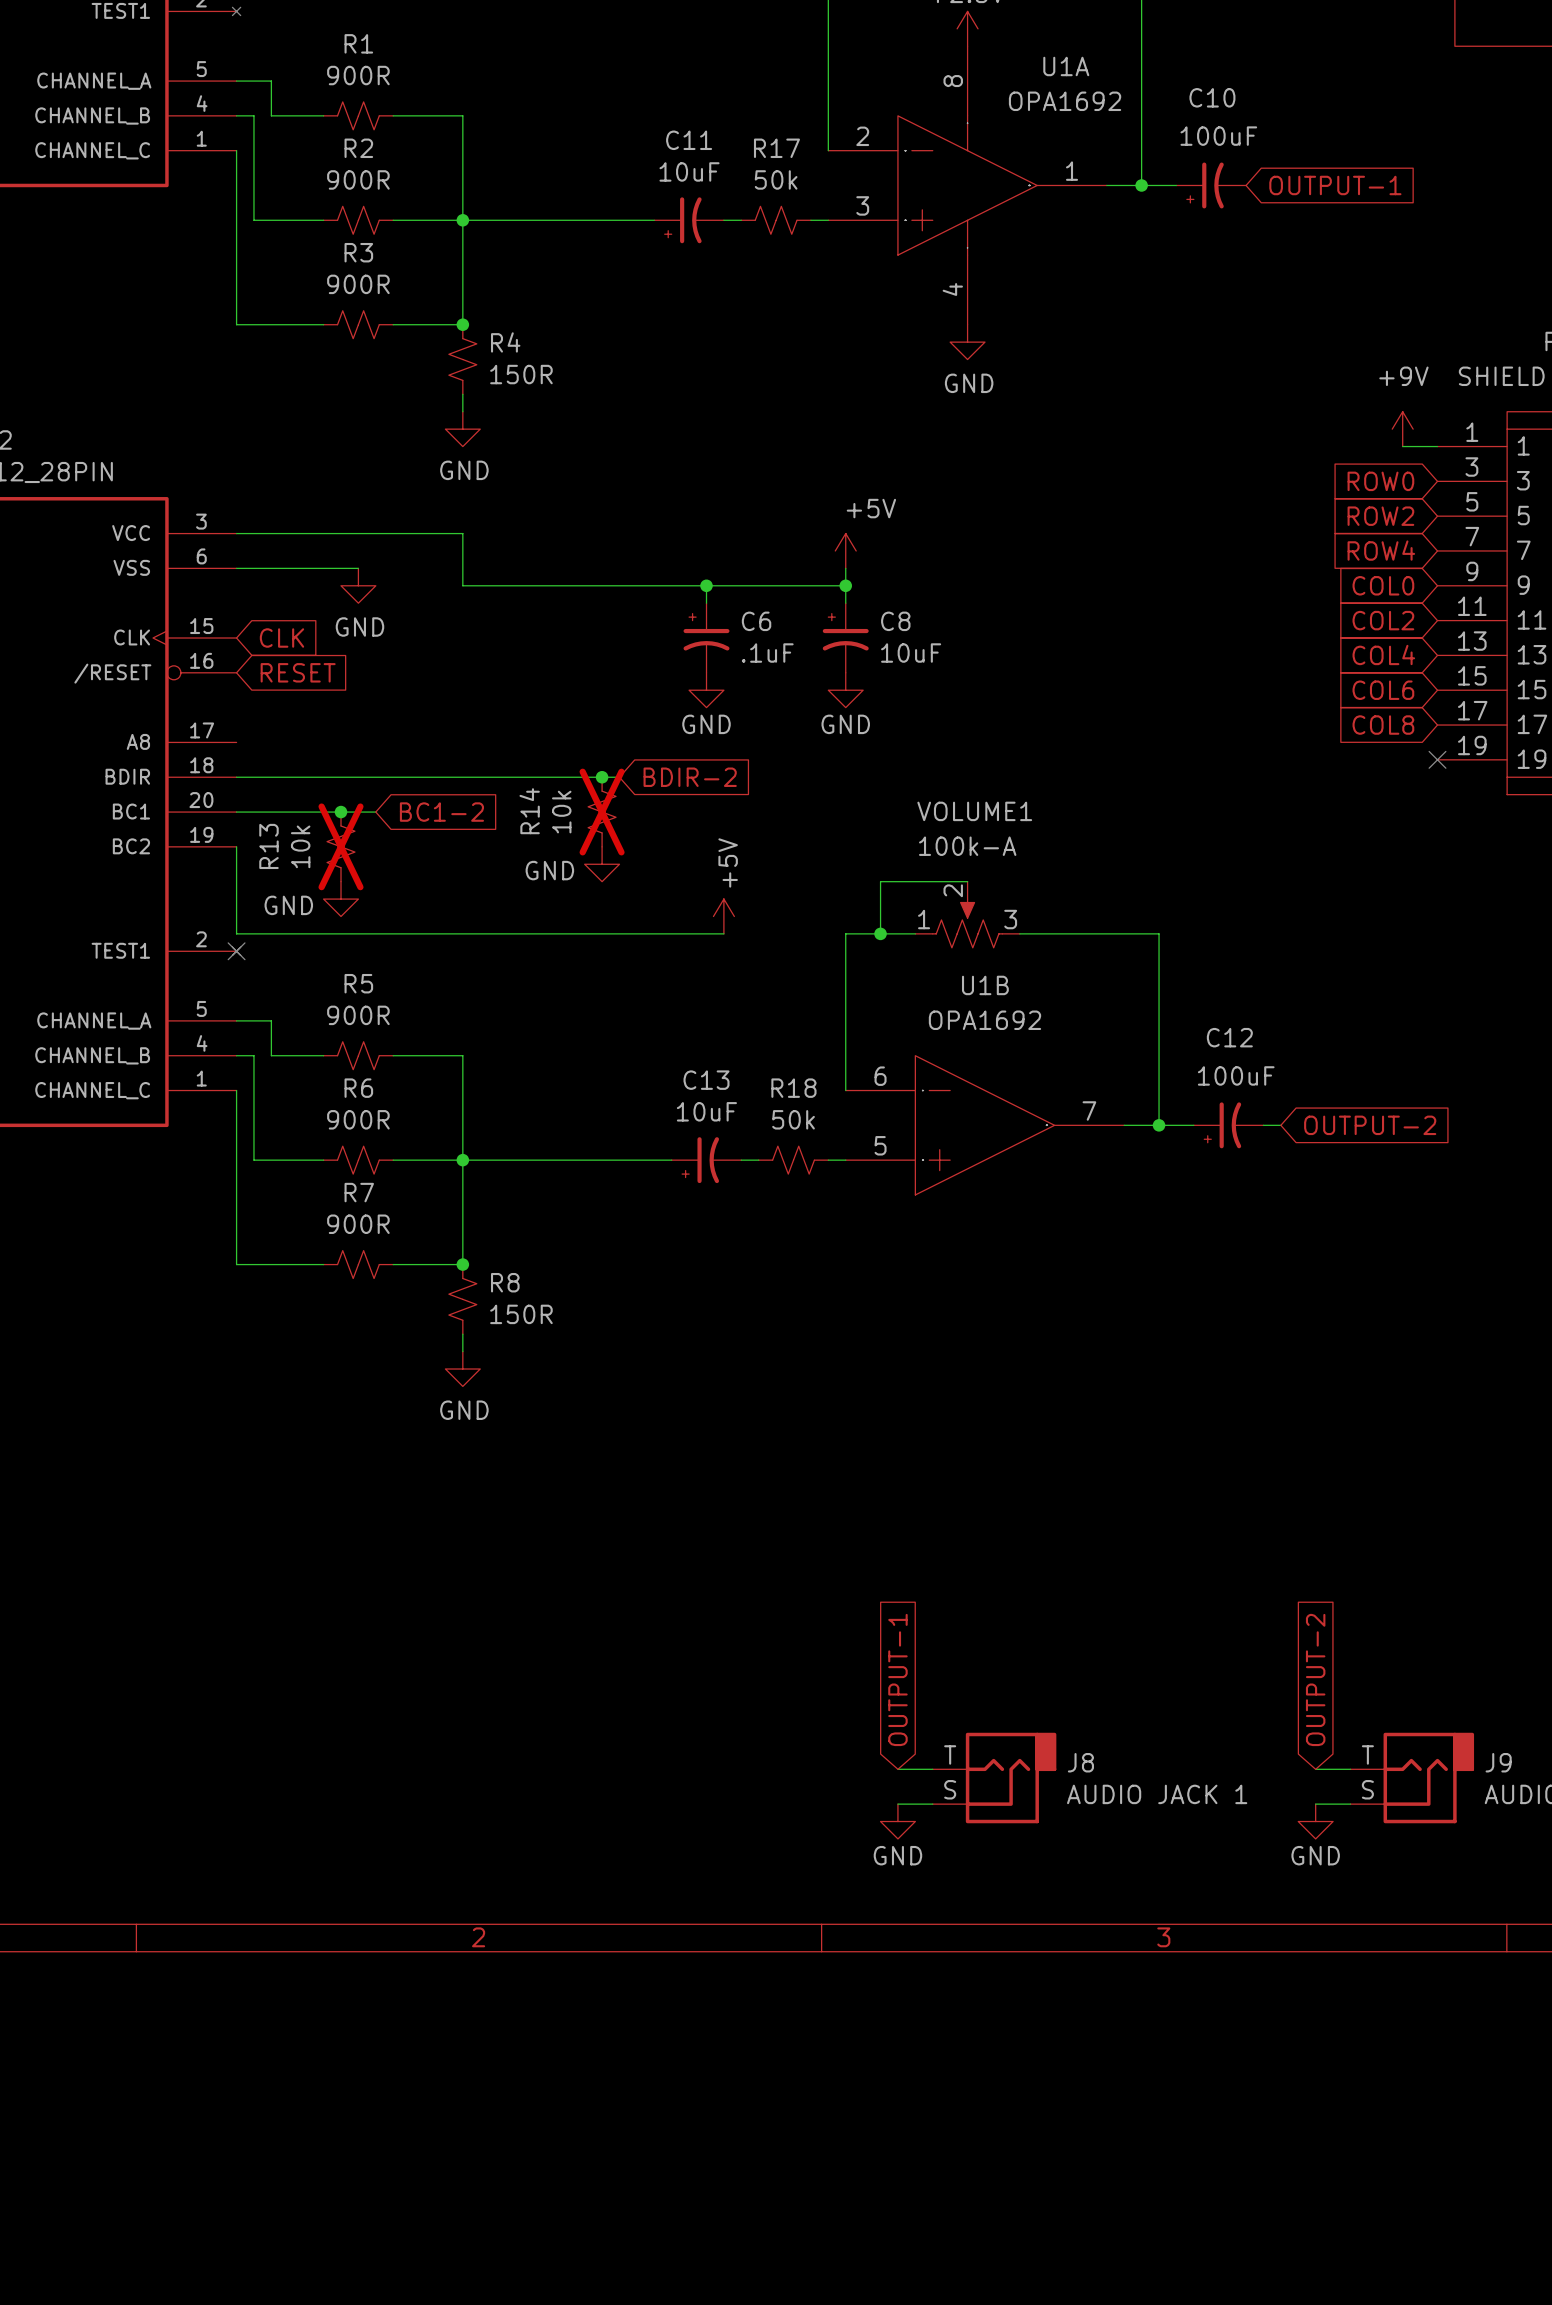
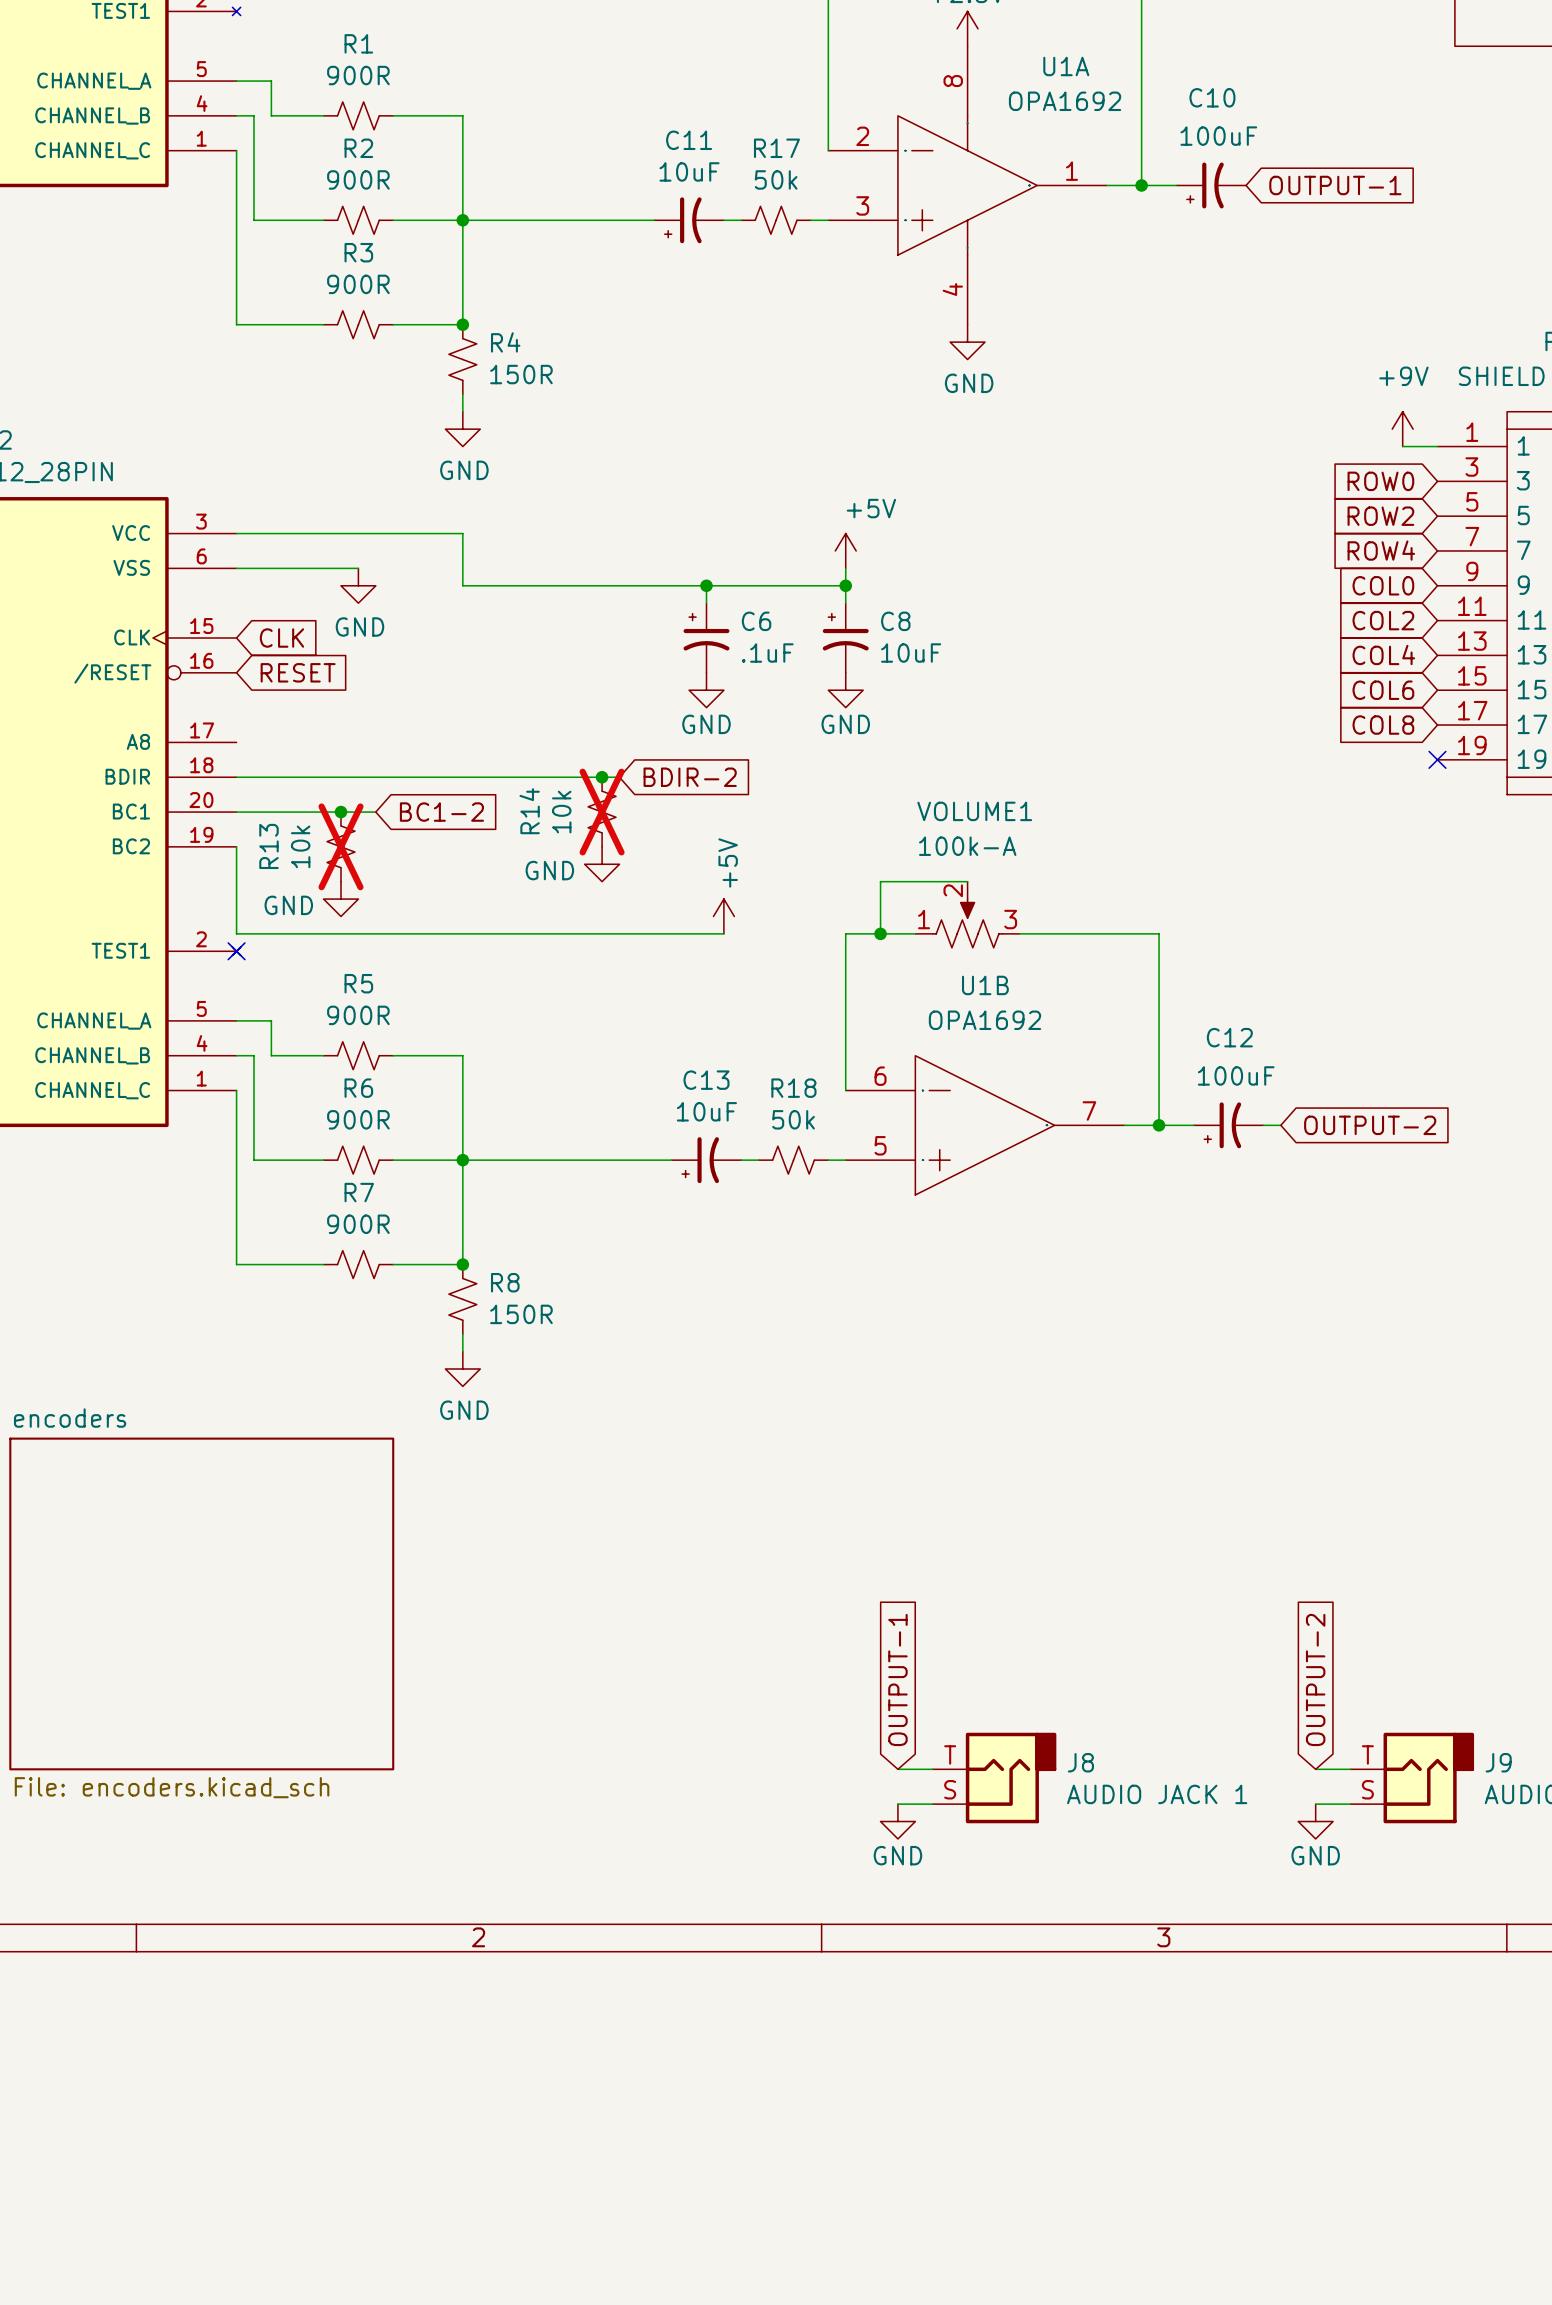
sheet encoders: none -> File: encoders.kicad_sch (201, 1603)

